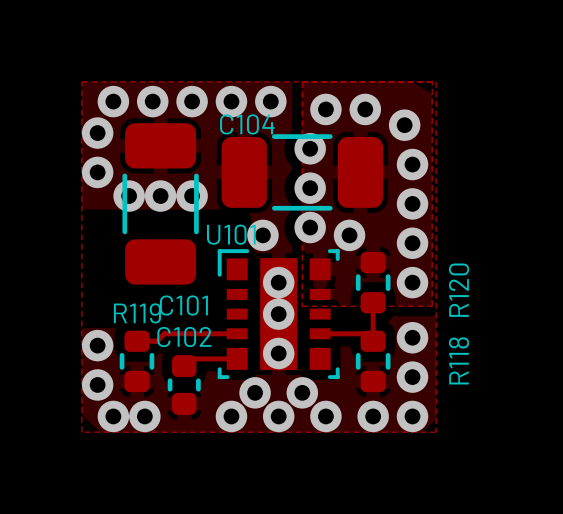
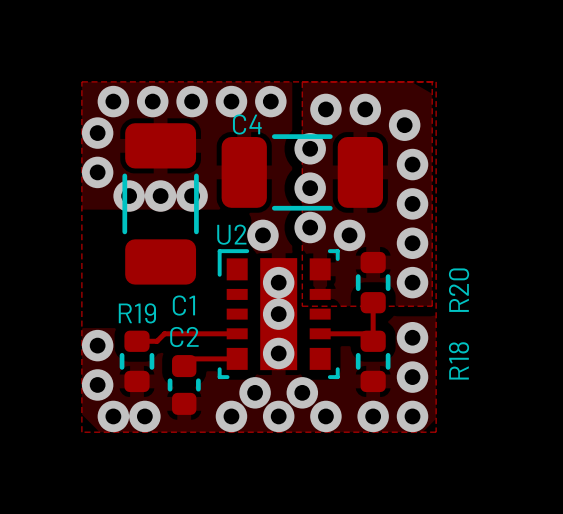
C104 name: C104 (247, 124) -> C4 (247, 124)
U101 name: U101 (231, 234) -> U2 (231, 234)
R120 name: R120 (459, 290) -> R20 (459, 290)
C101 name: C101 (183, 305) -> C1 (183, 305)
R119 name: R119 (137, 313) -> R19 (137, 313)
C102 name: C102 (184, 337) -> C2 (184, 337)
R118 name: R118 (458, 360) -> R18 (458, 360)

